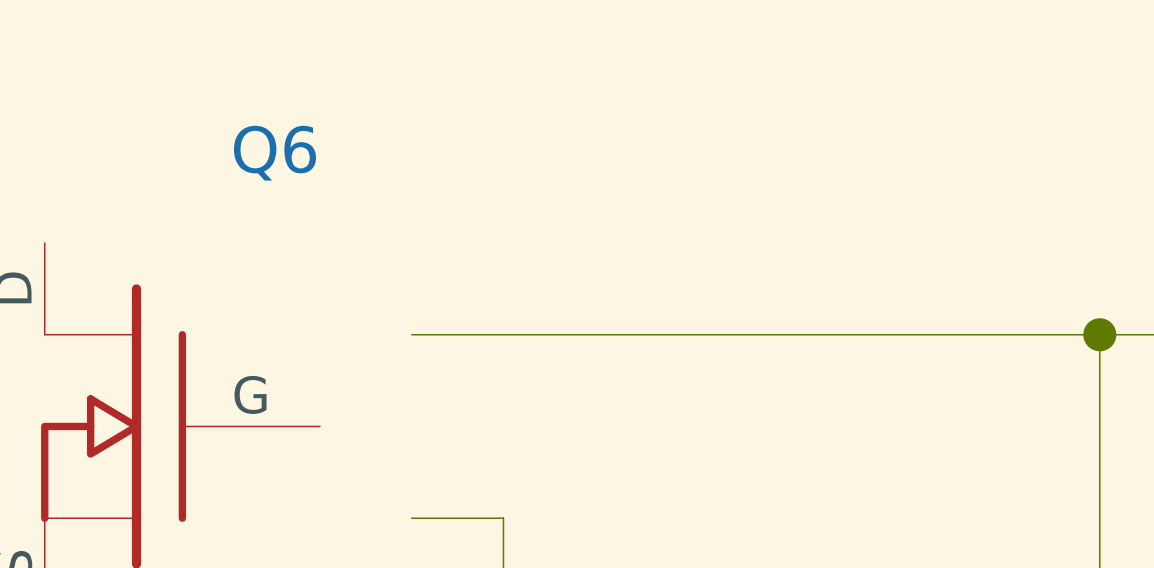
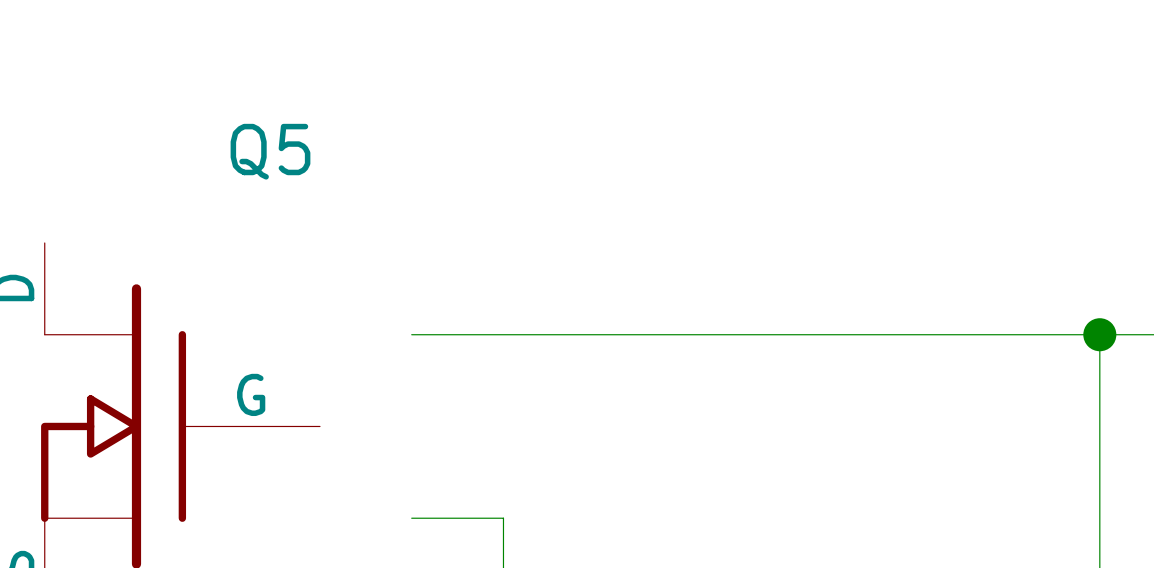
Q6 name: Q6 (274, 153) -> Q5 (270, 151)

